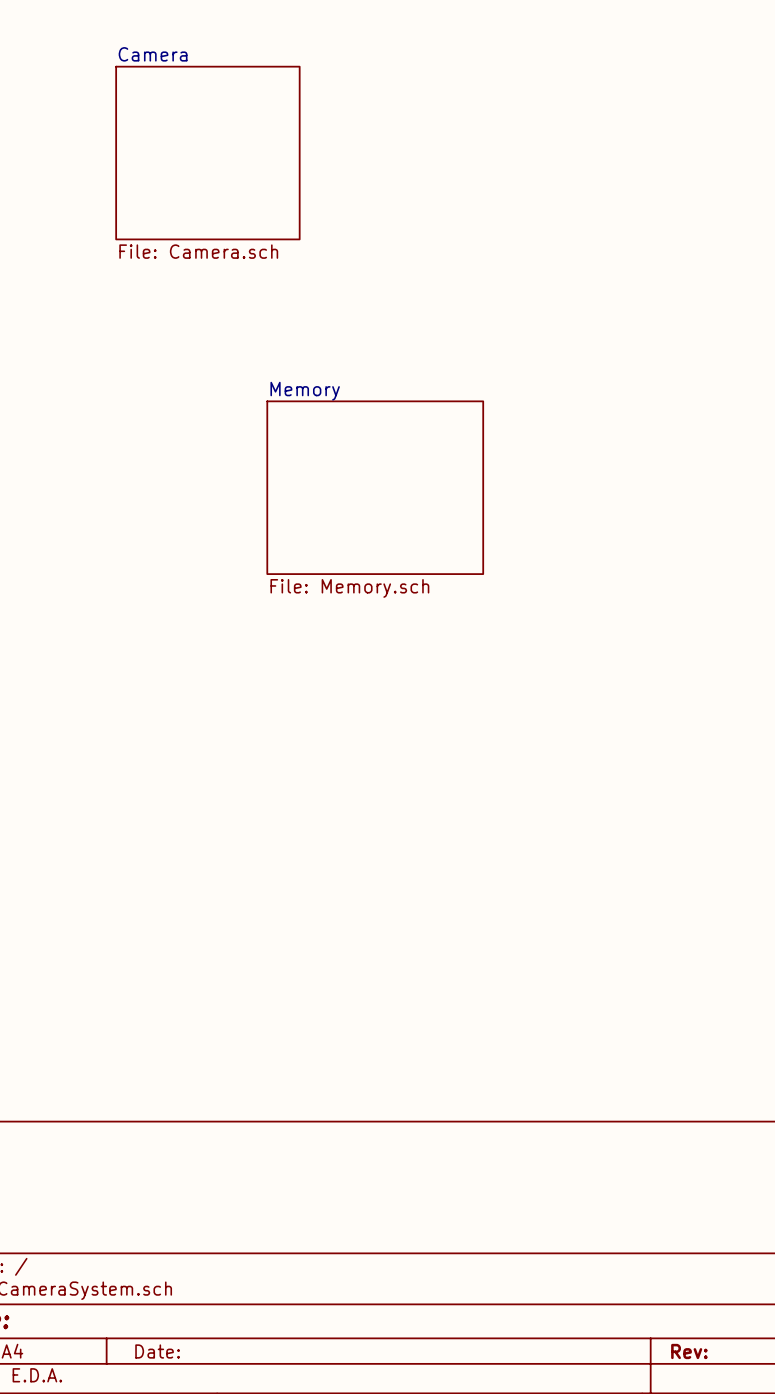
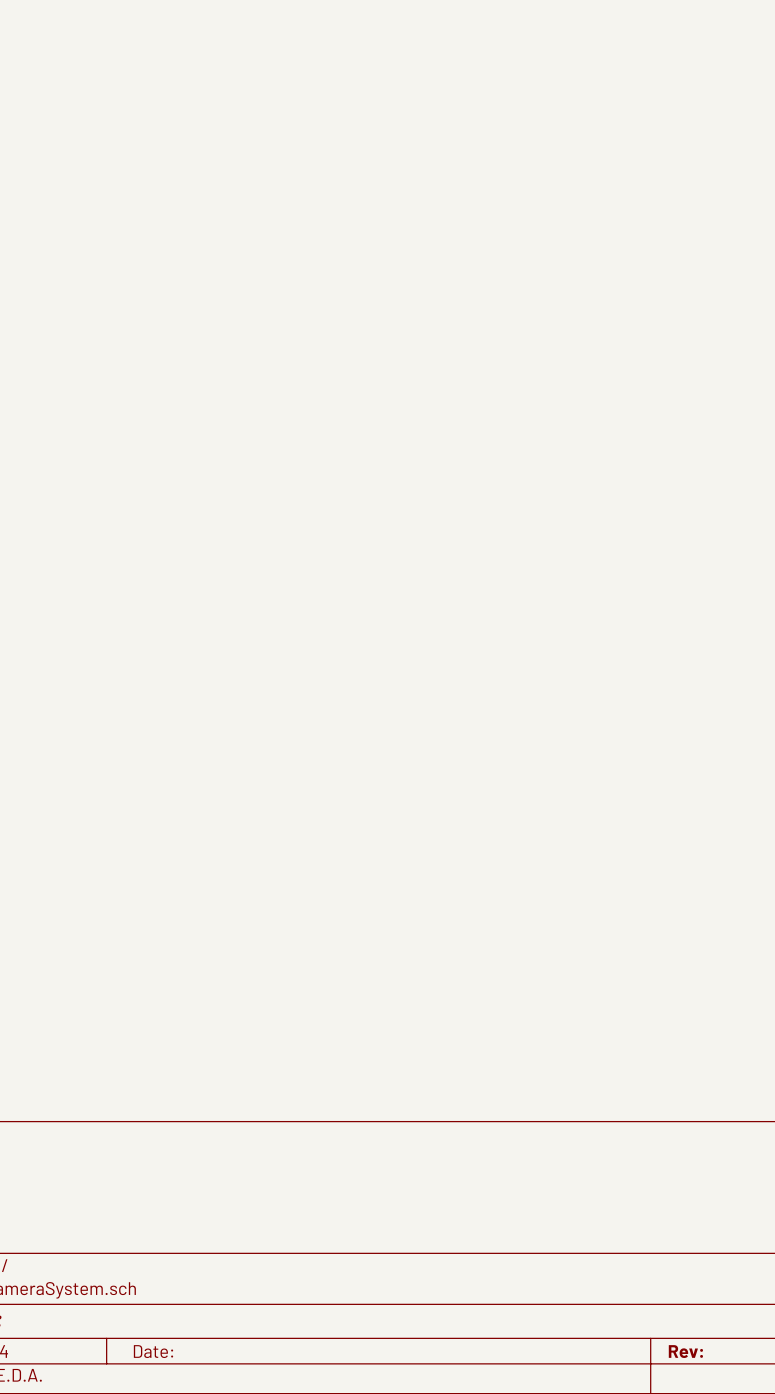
sheet Camera: File: Camera.sch (207, 153) -> none
sheet Memory: File: Memory.sch (375, 487) -> none

